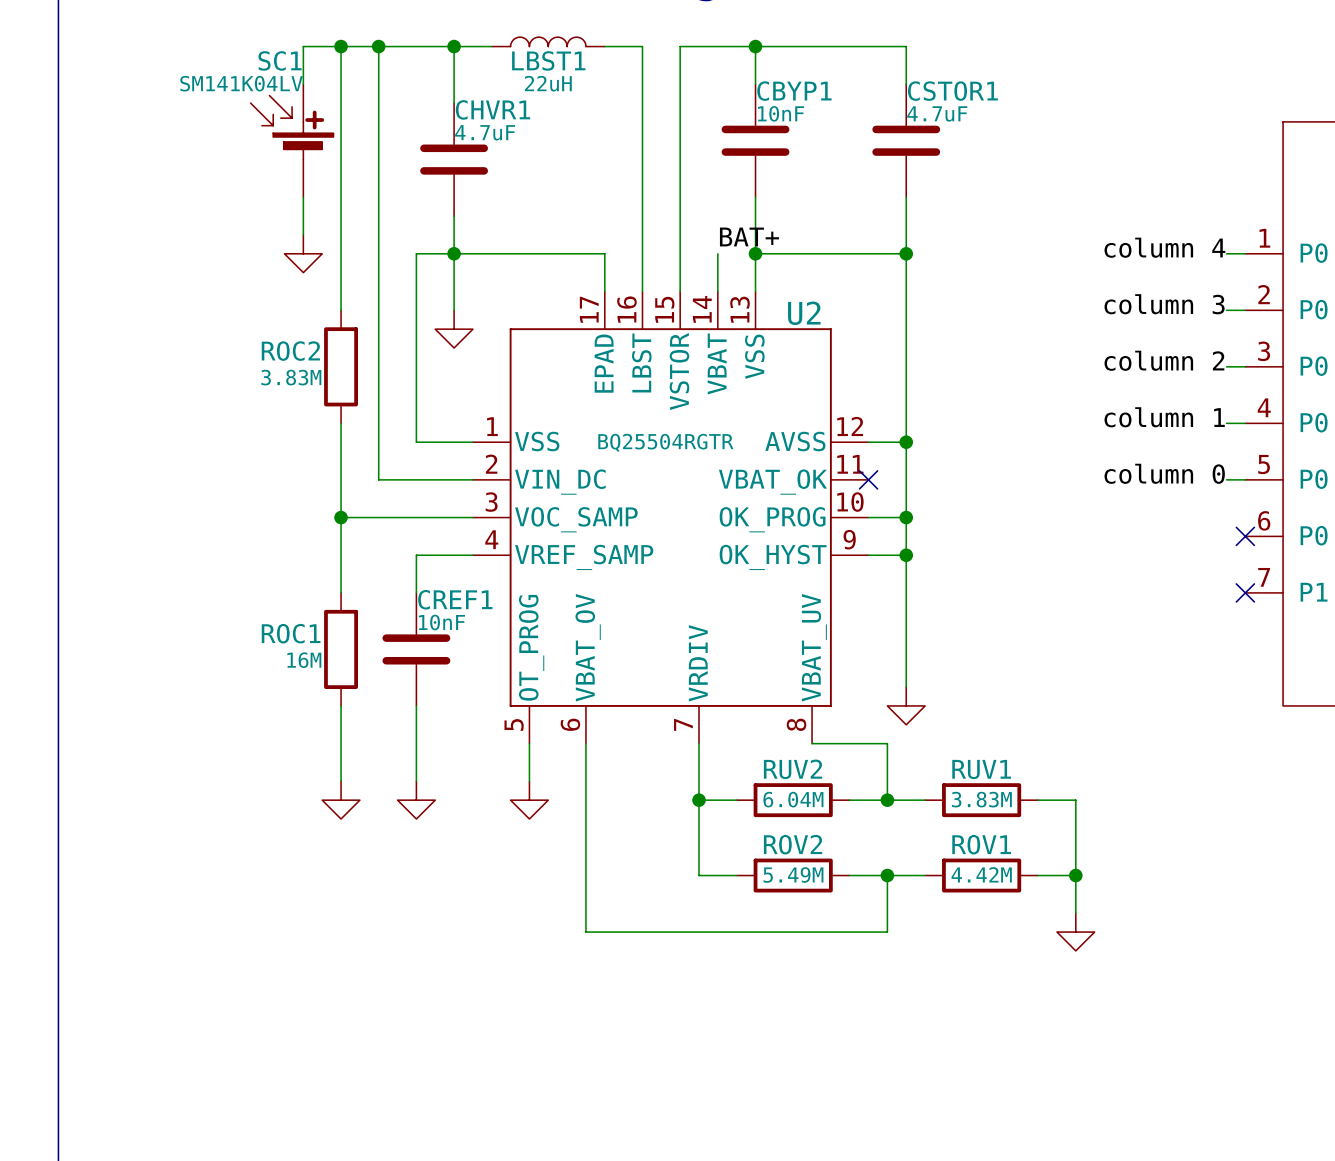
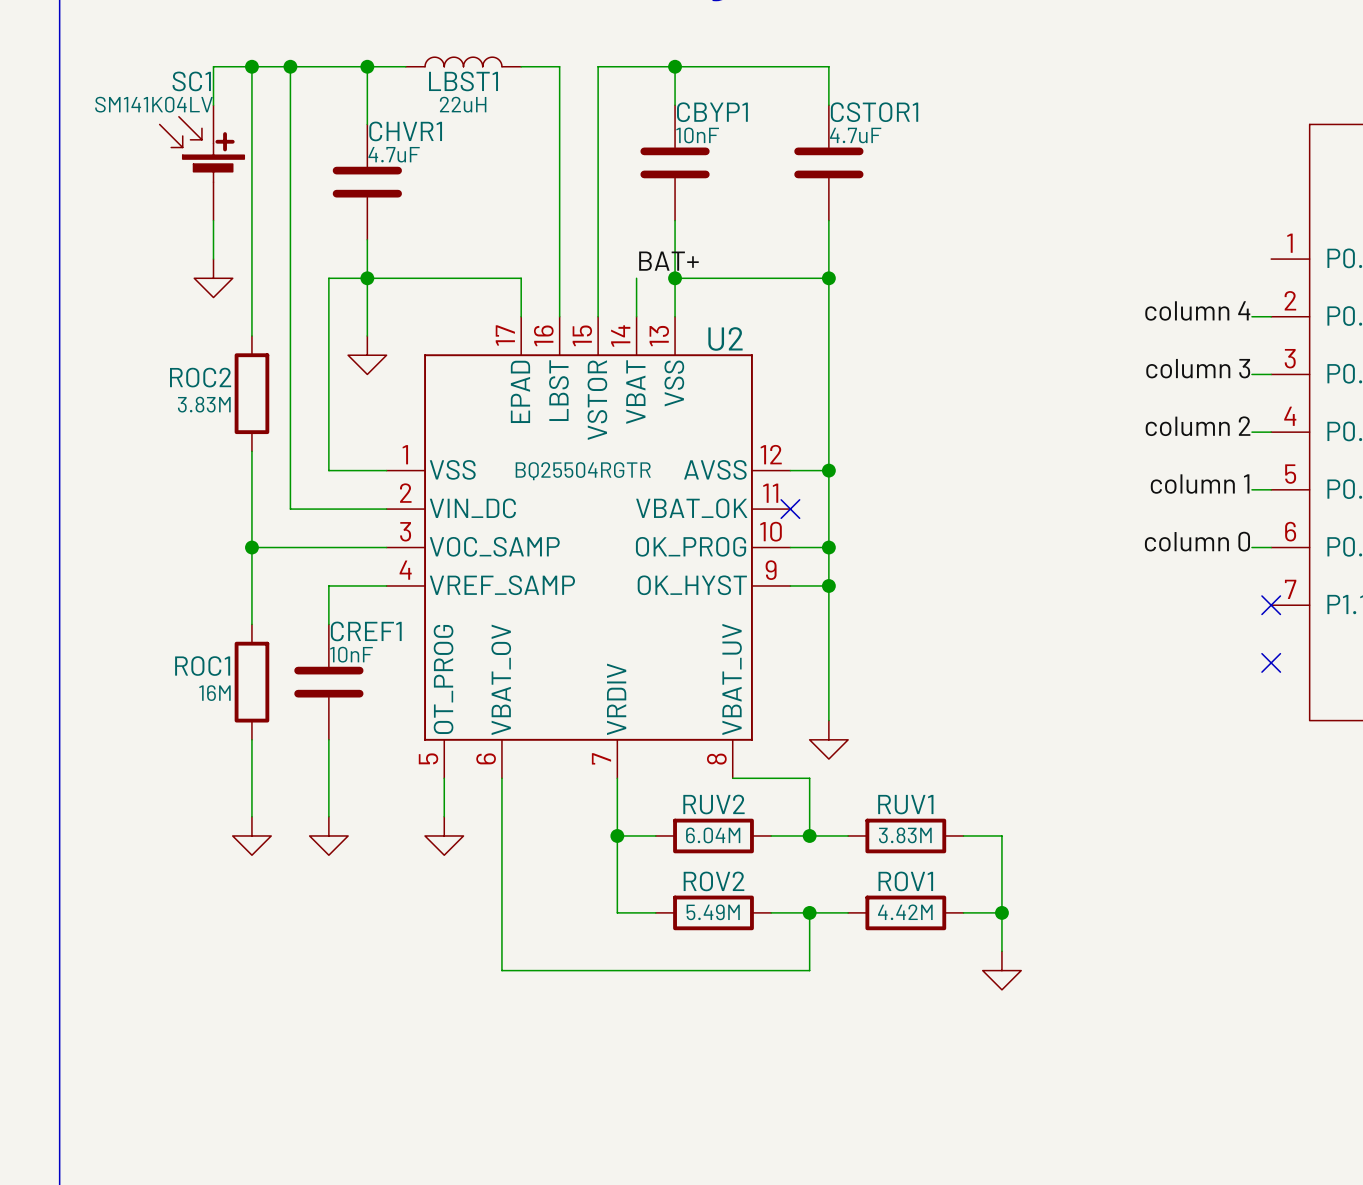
LBST1 position: (548, 41) -> (463, 61)
wire: (341, 46) (341, 310) -> (251, 66) (251, 335)
junction: (341, 46) -> none
wire: (378, 46) (378, 479) (472, 479) -> (290, 66) (290, 509) (386, 509)
junction: (378, 46) -> none
wire: (454, 46) (454, 103) -> (367, 66) (367, 124)
junction: (454, 46) -> none
wire: (491, 46) (303, 46) (303, 84) -> (405, 66) (213, 66) (213, 105)
wire: (604, 46) (642, 46) (642, 291) -> (521, 66) (559, 66) (559, 316)
wire: (755, 46) (755, 84) -> (675, 66) (675, 105)
junction: (755, 46) -> none
junction: none -> (251, 66)
junction: none -> (290, 66)
junction: none -> (367, 66)
junction: none -> (675, 66)
wire: (906, 84) (906, 46) (680, 46) (680, 291) -> (828, 105) (828, 66) (598, 66) (598, 316)
SC1 position: (292, 140) -> (201, 162)
CBYP1 position: (755, 140) -> (675, 162)
CSTOR1 position: (906, 140) -> (828, 162)
CHVR1 position: (454, 159) -> (367, 182)
wire: (303, 197) (303, 234) -> (213, 220) (213, 259)
wire: (755, 197) (755, 291) -> (675, 220) (675, 316)
wire: (906, 197) (906, 687) -> (828, 220) (828, 720)
wire: (454, 216) (454, 310) -> (367, 239) (367, 335)
label position: BAT+ (749, 236) -> BAT+ (668, 261)
label: column 4 (1164, 247) -> none
power symbol: (303, 253) -> none
junction: (454, 253) -> none
wire: (717, 253) (717, 291) -> (636, 278) (636, 316)
wire: (755, 253) (906, 253) -> (675, 278) (828, 278)
junction: (755, 253) -> none
junction: (906, 253) -> none
wire: (1226, 253) (1245, 253) -> (1251, 547) (1271, 547)
power symbol: none -> (213, 278)
junction: none -> (367, 278)
junction: none -> (675, 278)
junction: none -> (828, 278)
wire: (604, 291) (604, 253) (416, 253) (416, 442) (472, 442) -> (521, 316) (521, 278) (328, 278) (328, 470) (386, 470)
label: column 3 (1164, 304) -> column 4 (1197, 310)
power symbol: (454, 329) -> none
power symbol: none -> (367, 355)
label: column 2 (1164, 360) -> column 3 (1198, 368)
ROC2 position: (341, 366) -> (251, 393)
label: column 1 (1164, 417) -> column 2 (1198, 426)
wire: (341, 423) (341, 592) -> (251, 451) (251, 624)
wire: (868, 442) (906, 442) -> (790, 470) (828, 470)
junction: (906, 442) -> none
junction: none -> (828, 470)
label: column 0 (1164, 473) -> column 1 (1200, 484)
no-connect mark: (868, 479) -> none
no-connect mark: none -> (790, 509)
wire: (341, 517) (472, 517) -> (251, 547) (386, 547)
junction: (341, 517) -> none
U2 position: (670, 517) -> (588, 547)
wire: (868, 517) (906, 517) -> (790, 547) (828, 547)
junction: (906, 517) -> none
label: none -> column 0 (1197, 541)
junction: none -> (251, 547)
junction: none -> (828, 547)
no-connect mark: (1245, 536) -> none
wire: (472, 555) (416, 555) (416, 592) -> (386, 585) (328, 585) (328, 624)
wire: (868, 555) (906, 555) -> (790, 585) (828, 585)
junction: (906, 555) -> none
junction: none -> (828, 585)
ROC1 position: (341, 649) -> (251, 682)
CREF1 position: (416, 649) -> (328, 682)
no-connect mark: none -> (1271, 662)
wire: (341, 705) (341, 781) -> (251, 739) (251, 816)
wire: (416, 705) (416, 781) -> (328, 739) (328, 816)
power symbol position: (906, 705) -> (828, 739)
wire: (529, 743) (529, 781) -> (444, 778) (444, 816)
wire: (585, 743) (585, 932) (887, 932) (887, 875) -> (501, 778) (501, 970) (809, 970) (809, 912)
wire: (699, 743) (699, 875) (736, 875) -> (617, 778) (617, 912) (655, 912)
wire: (812, 743) (887, 743) (887, 800) -> (732, 778) (809, 778) (809, 835)
power symbol position: (341, 800) -> (328, 835)
power symbol position: (416, 800) -> (444, 835)
power symbol: (529, 800) -> none
wire: (699, 800) (736, 800) -> (617, 835) (655, 835)
junction: (699, 800) -> none
RUV2 position: (793, 800) -> (713, 835)
wire: (849, 800) (925, 800) -> (771, 835) (848, 835)
junction: (887, 800) -> none
RUV1 position: (981, 800) -> (905, 835)
wire: (1038, 800) (1075, 800) (1075, 913) -> (963, 835) (1001, 835) (1001, 951)
power symbol: none -> (251, 835)
junction: none -> (617, 835)
junction: none -> (809, 835)
ROV2 position: (793, 875) -> (713, 912)
wire: (849, 875) (925, 875) -> (771, 912) (848, 912)
junction: (887, 875) -> none
ROV1 position: (981, 875) -> (905, 912)
wire: (1038, 875) (1075, 875) -> (963, 912) (1001, 912)
junction: (1075, 875) -> none
junction: none -> (809, 912)
junction: none -> (1001, 912)
power symbol position: (1075, 932) -> (1001, 970)

